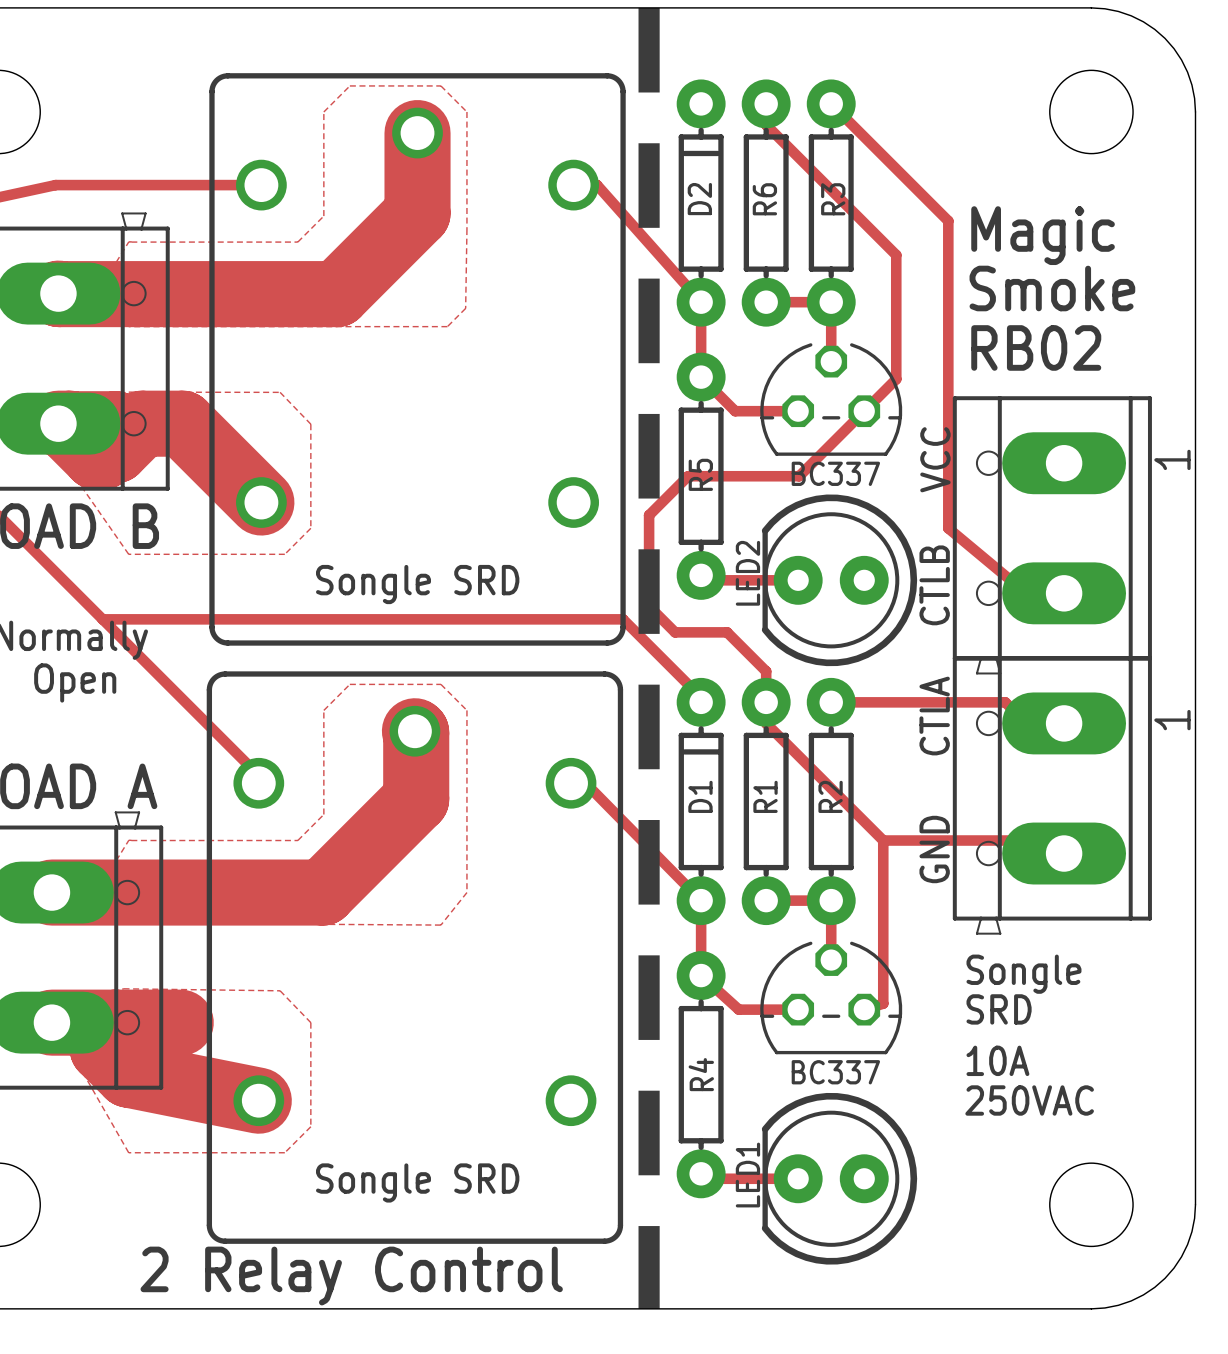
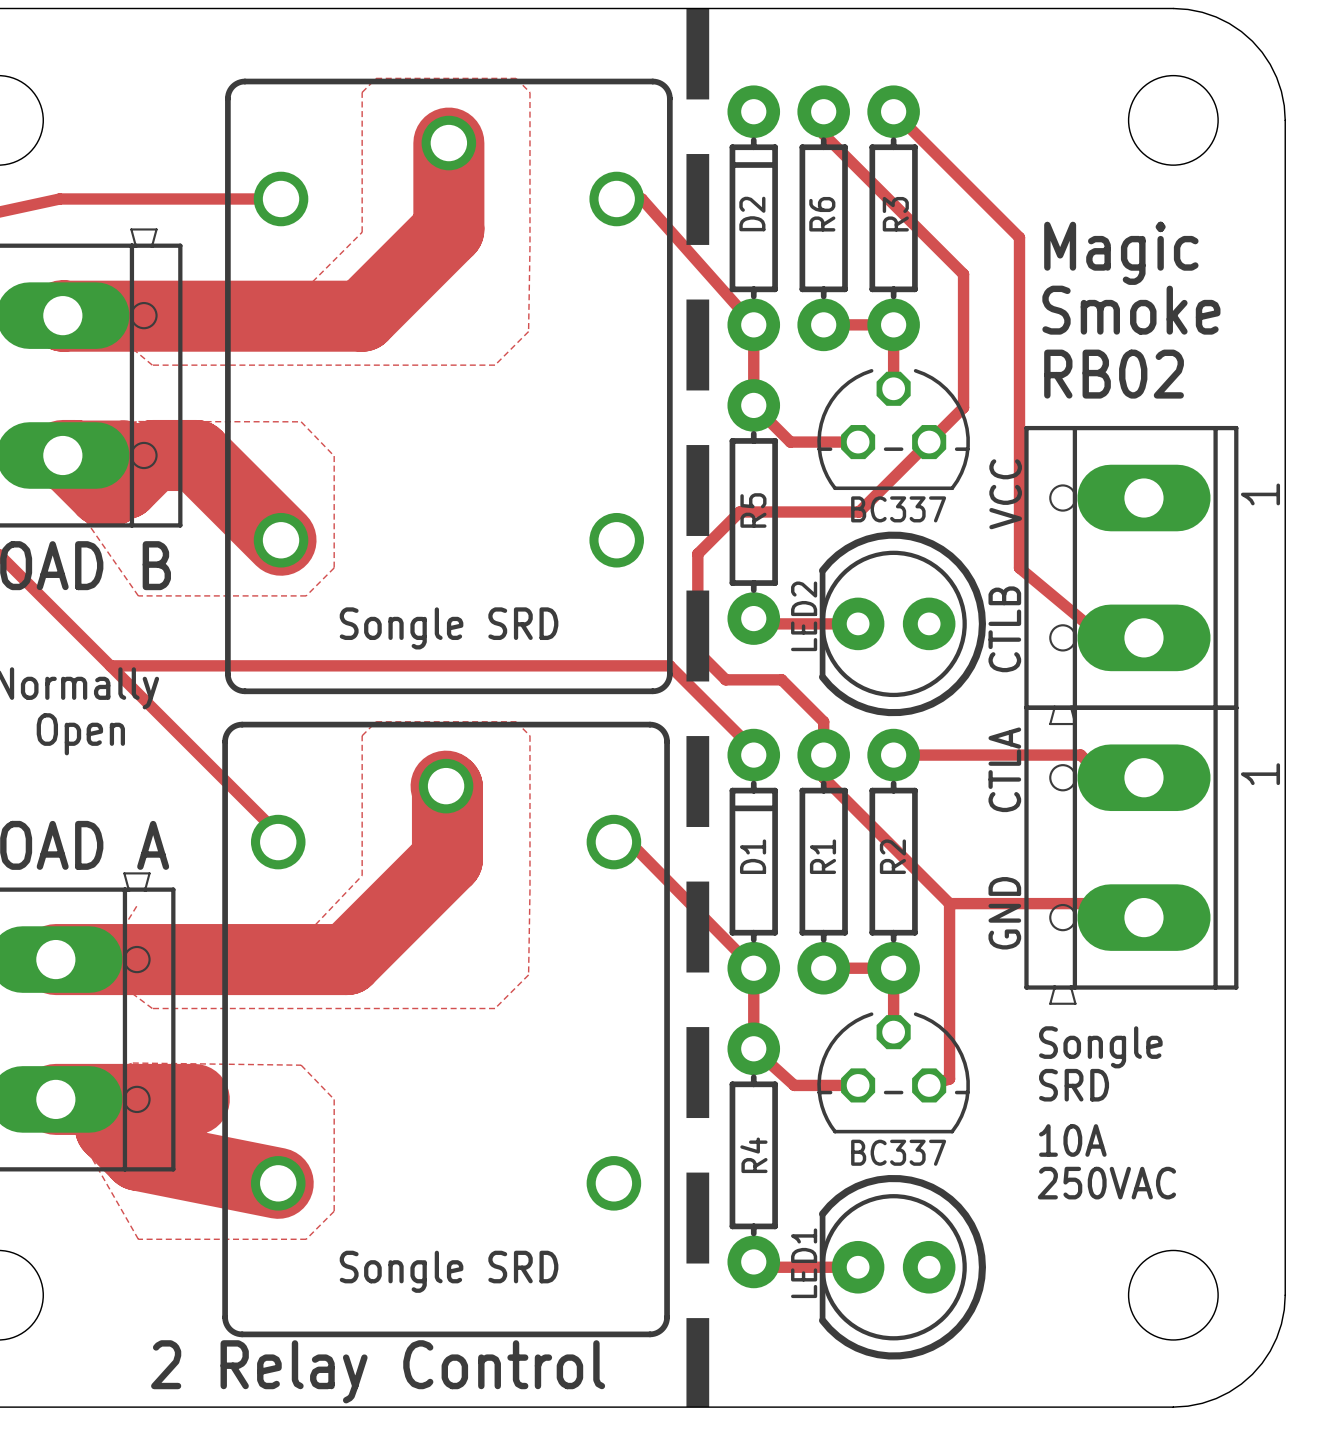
zone outline: (128, 242) (96, 294) (122, 324) (128, 320) (128, 326) (447, 326) (465, 308) (466, 111) (440, 85) (349, 85) (323, 111) (323, 216) (297, 242) (131, 242) -> none
zone outline: none -> (278, 302) (103, 317) (110, 330) (152, 365) (495, 365) (528, 331) (529, 92) (516, 78) (376, 78) (362, 92) (362, 232) (292, 302) (281, 302)
zone outline: (131, 840) (297, 840) (323, 814) (323, 710) (349, 684) (440, 684) (466, 710) (466, 892) (440, 925) (122, 923) -> (103, 960) (309, 931) (362, 875) (362, 735) (376, 721) (516, 721) (529, 735) (528, 974) (495, 1008) (152, 1008) (124, 987) (131, 992)

